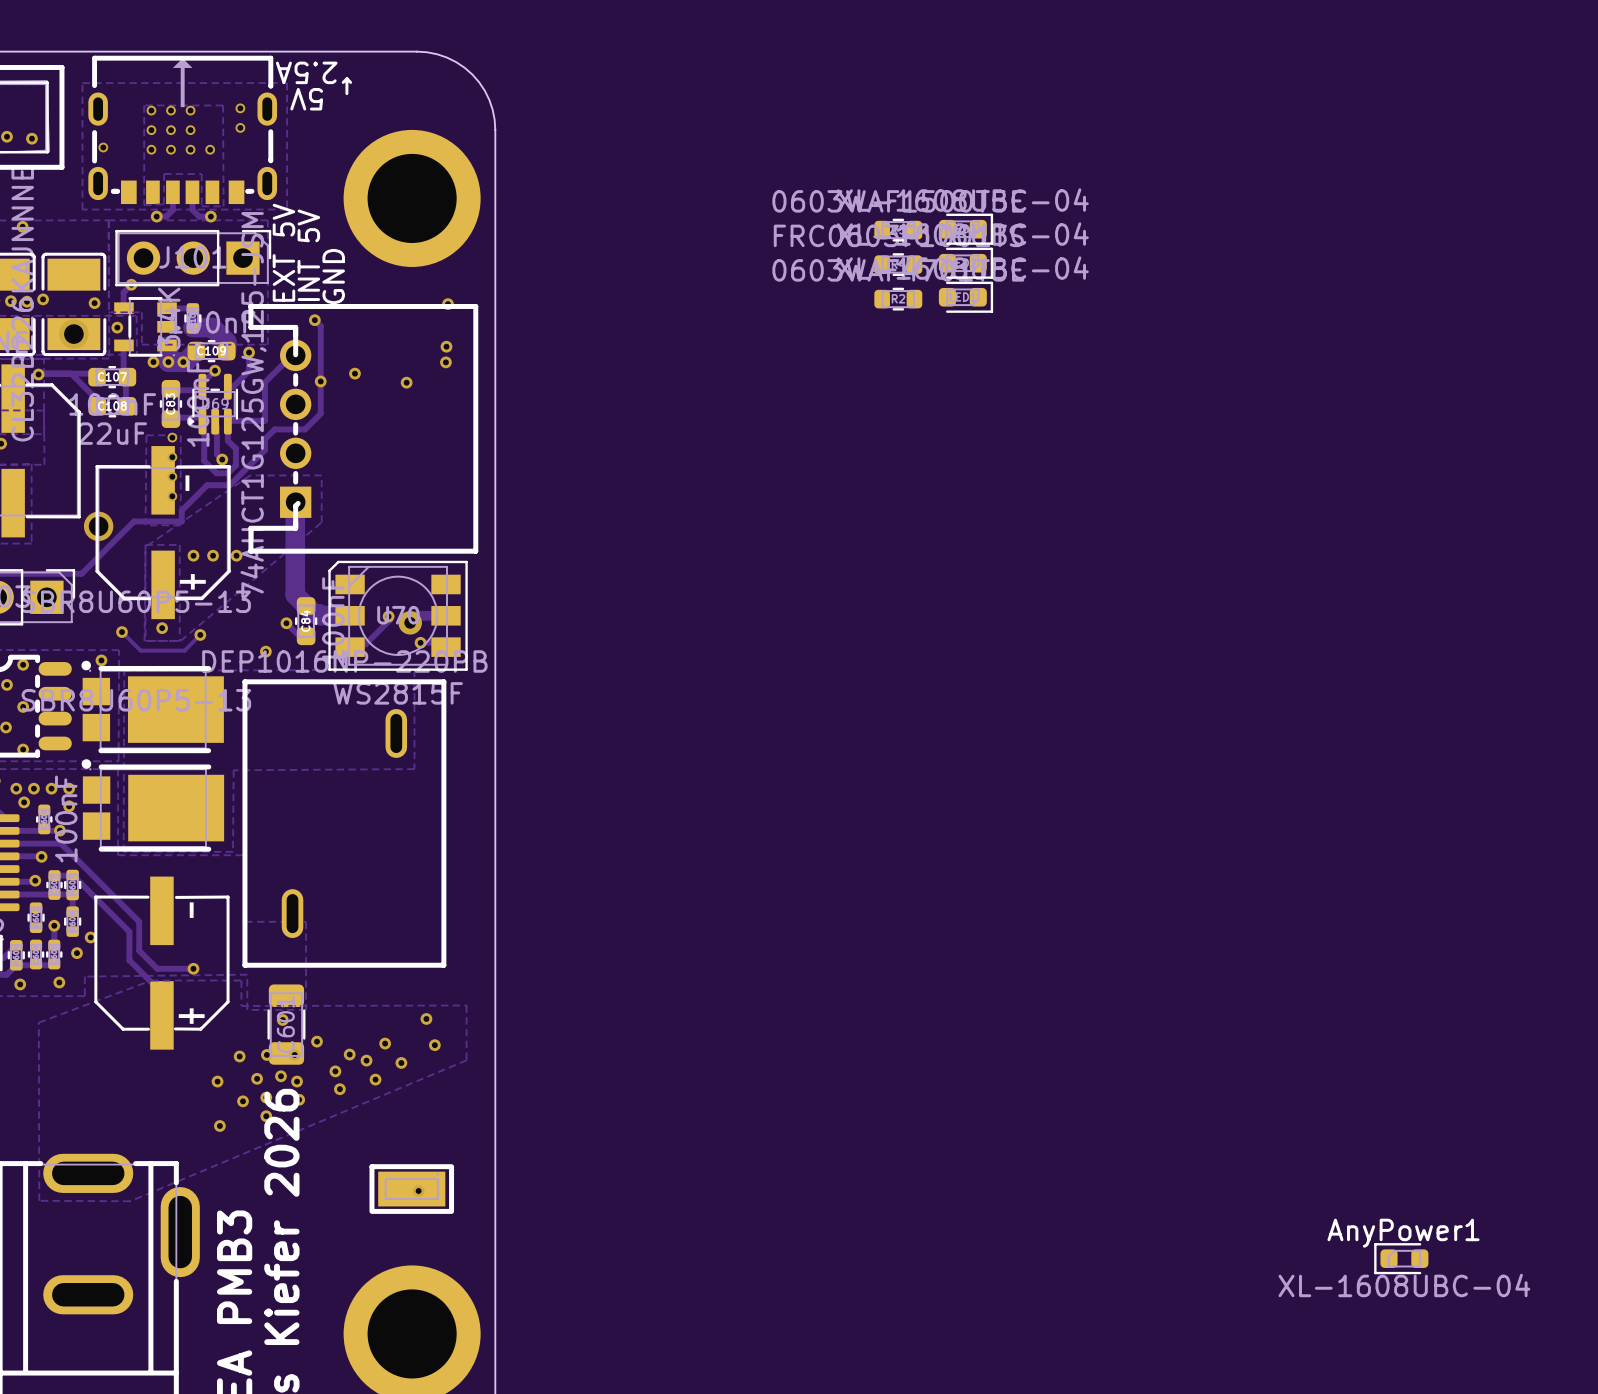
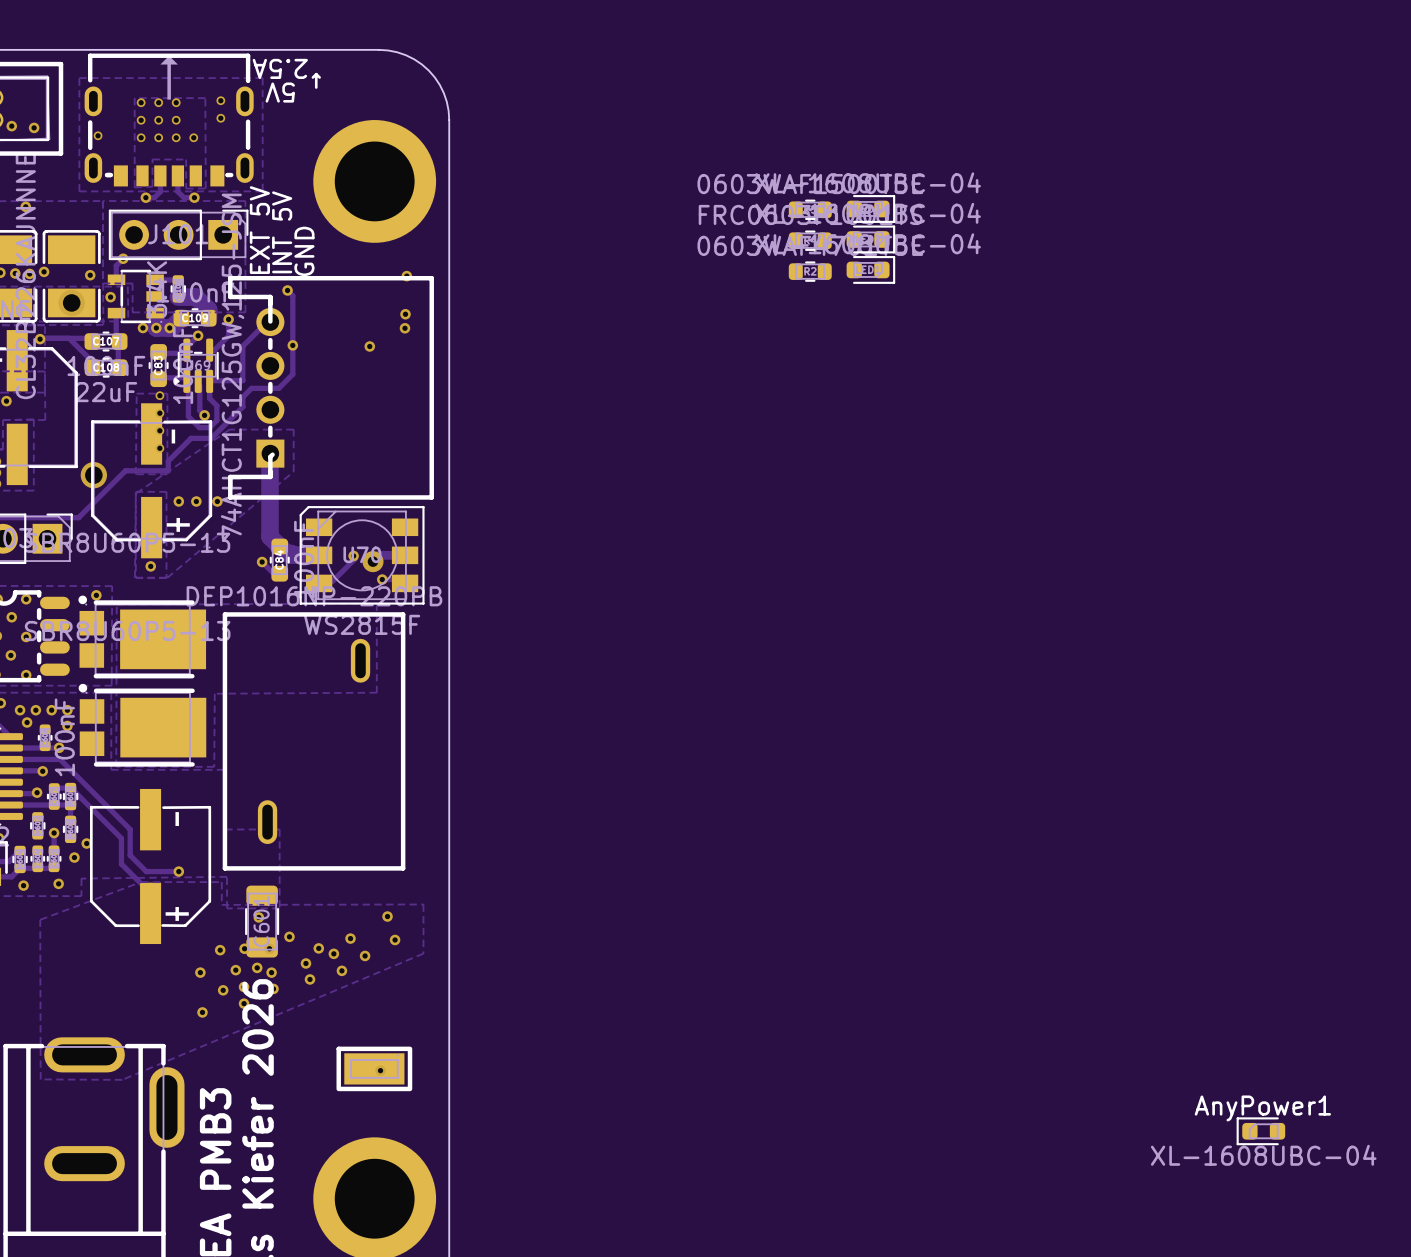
via: (354, 373) -> none
track: (122, 632) (140, 650) (184, 650) (200, 634) -> none
via: (122, 632) -> none
via: (200, 634) -> none
via: (265, 651) -> none

